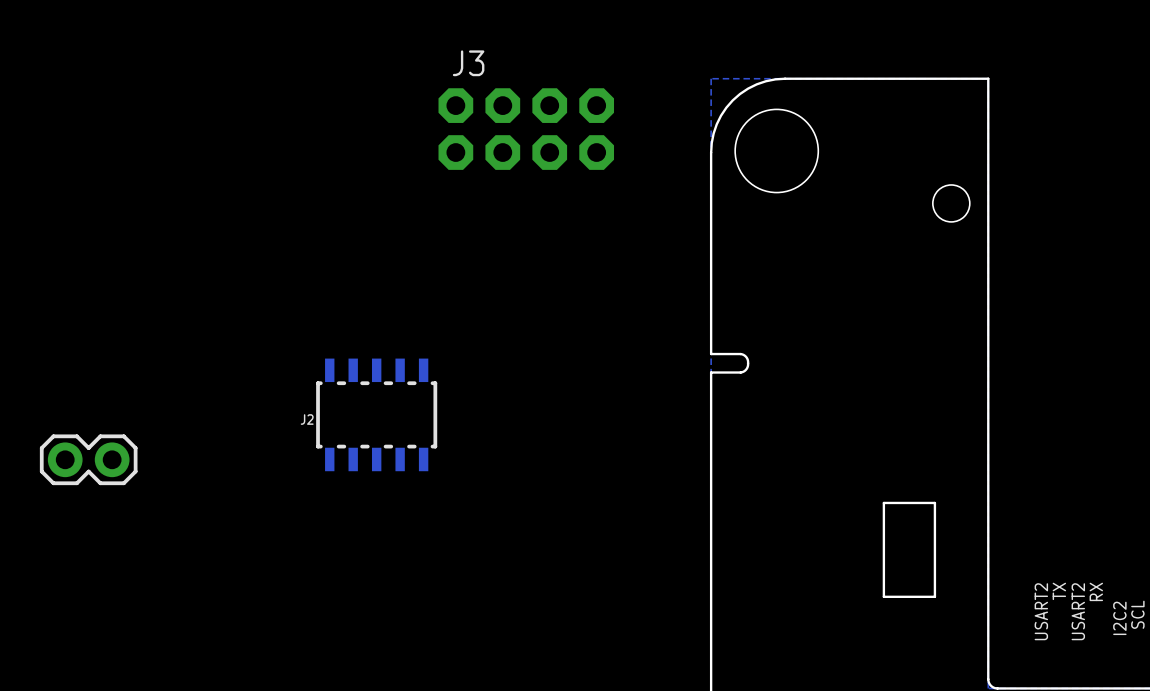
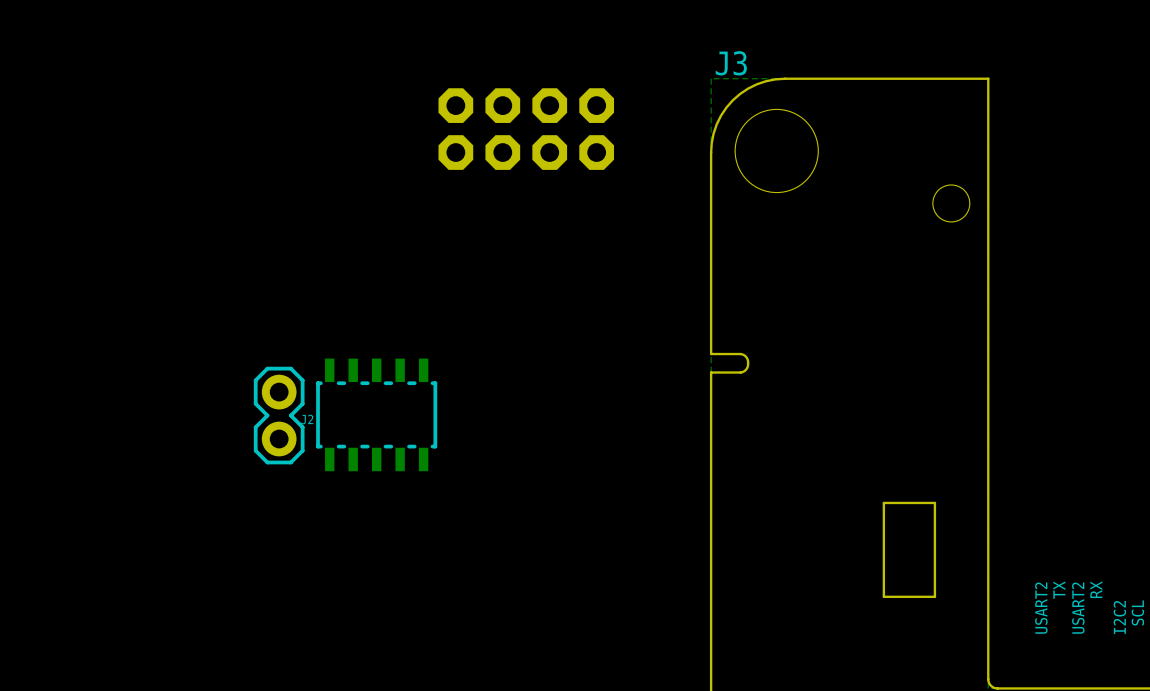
J3 name position: J3 (468, 63) -> J3 (731, 63)
part rotation: 0° (88, 459) -> 90° clockwise (279, 415)
part position: (88, 459) -> (279, 415)

